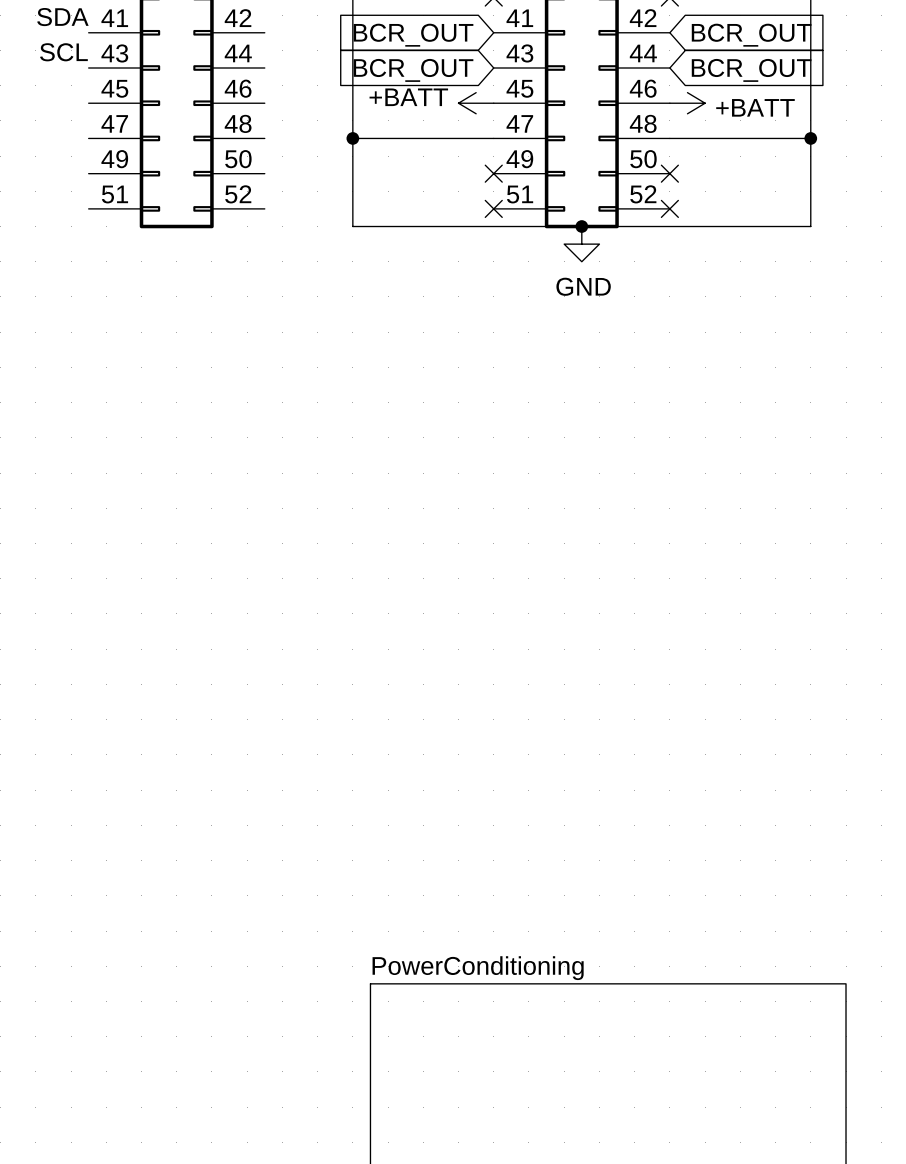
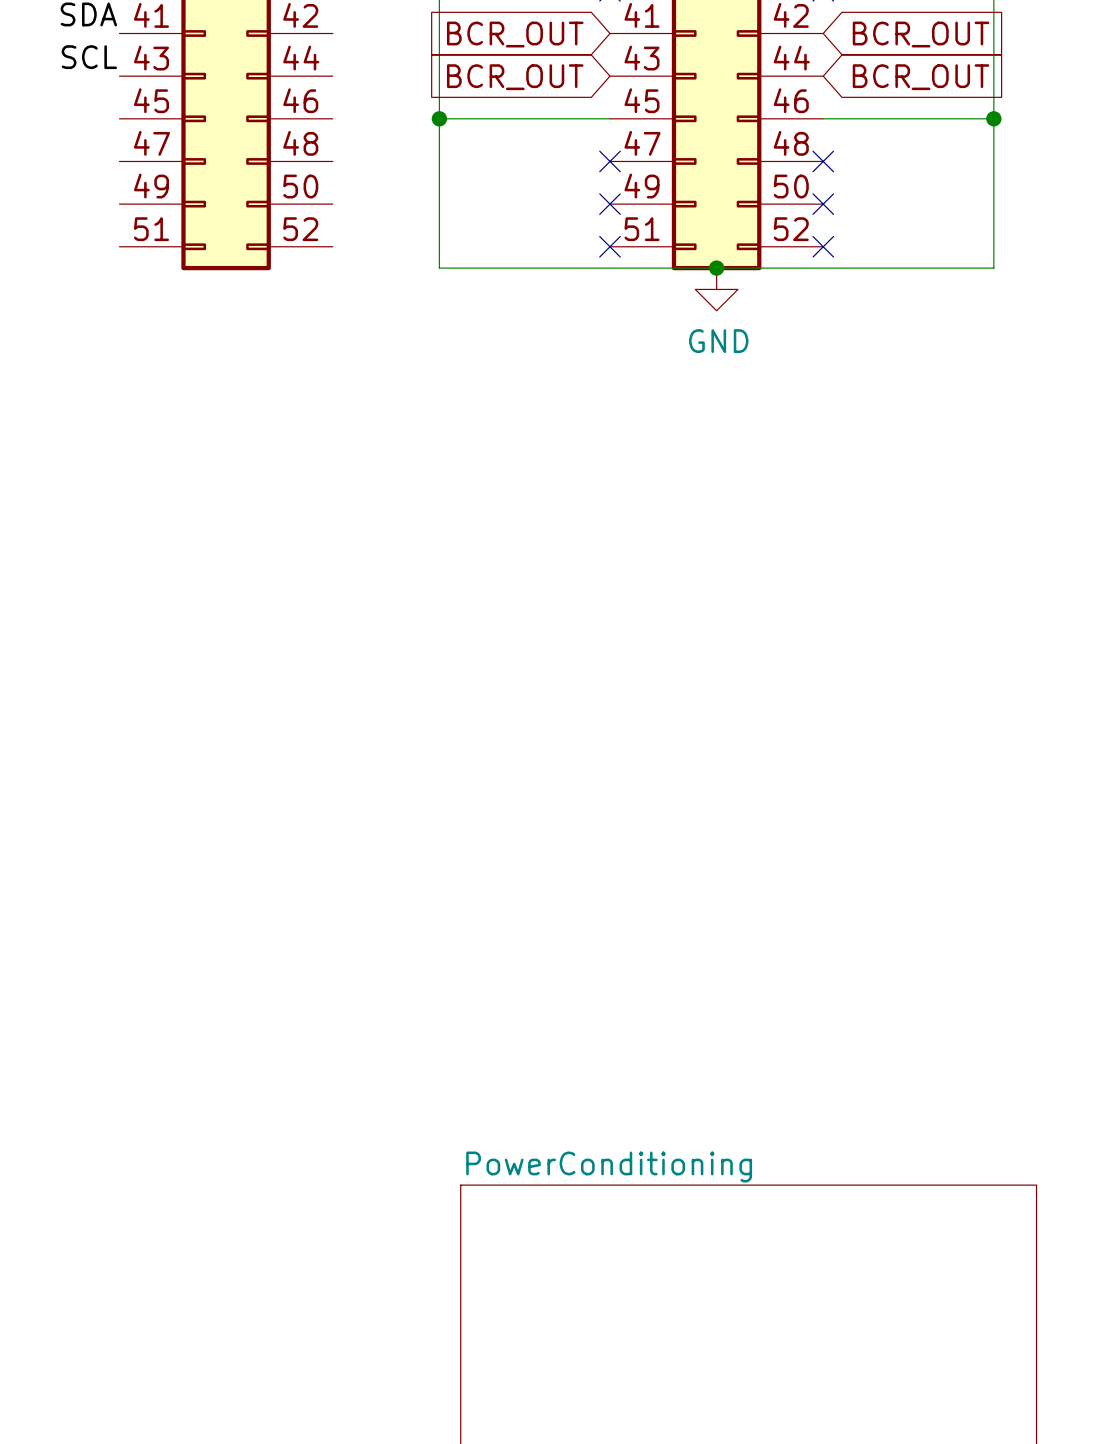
power symbol: +BATT (476, 103) -> none
power symbol: +BATT (687, 103) -> none
wire: (352, 138) (493, 138) -> (439, 118) (610, 118)
junction position: (352, 138) -> (439, 118)
no-connect mark: none -> (610, 161)
wire: (669, 138) (810, 138) -> (823, 118) (993, 118)
no-connect mark: none -> (823, 161)
junction position: (810, 138) -> (993, 118)

